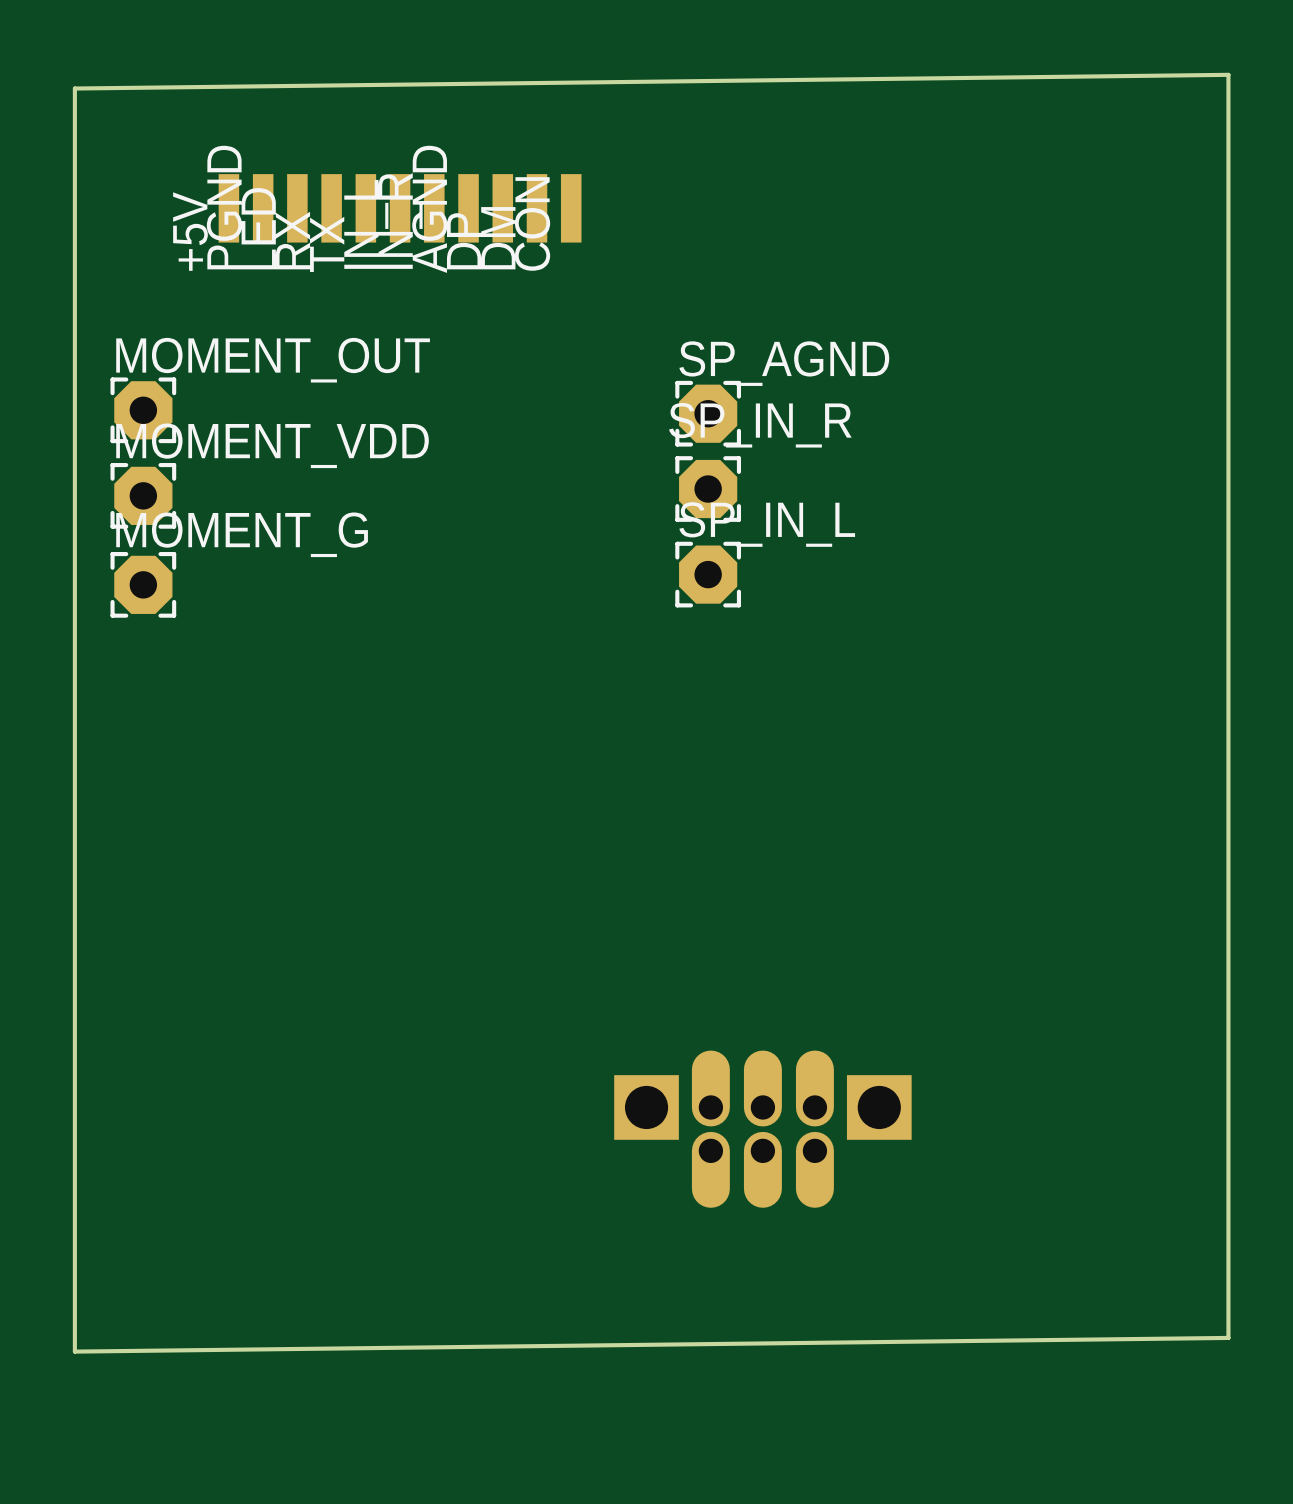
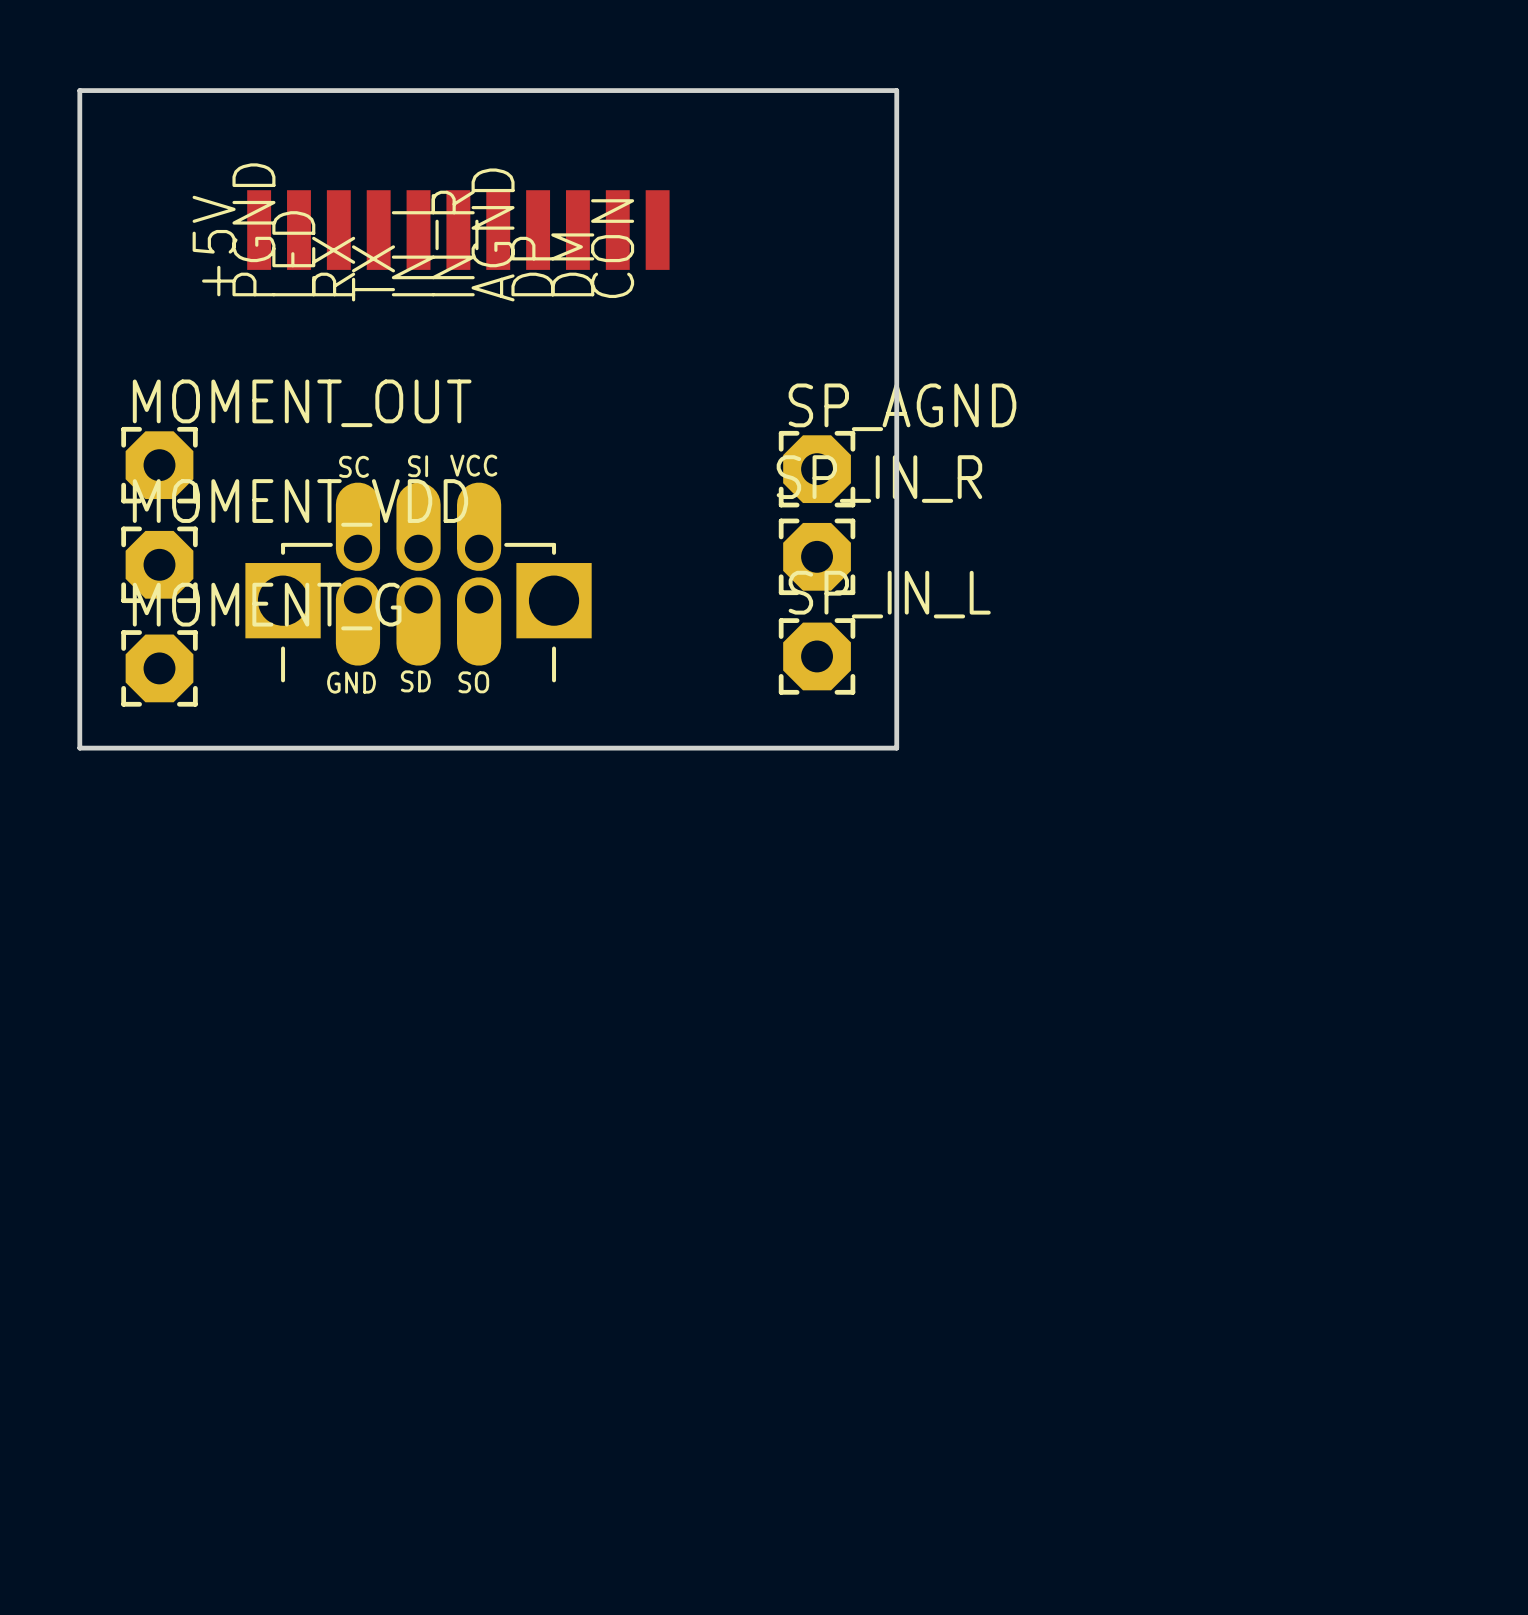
board edge: (74, 88) (1228, 74) (1228, 1337) (74, 1351) (74, 653) -> (79, 90) (896, 90) (896, 748) (79, 748)
part: none -> (418, 582)
part: (762, 1129) -> none

